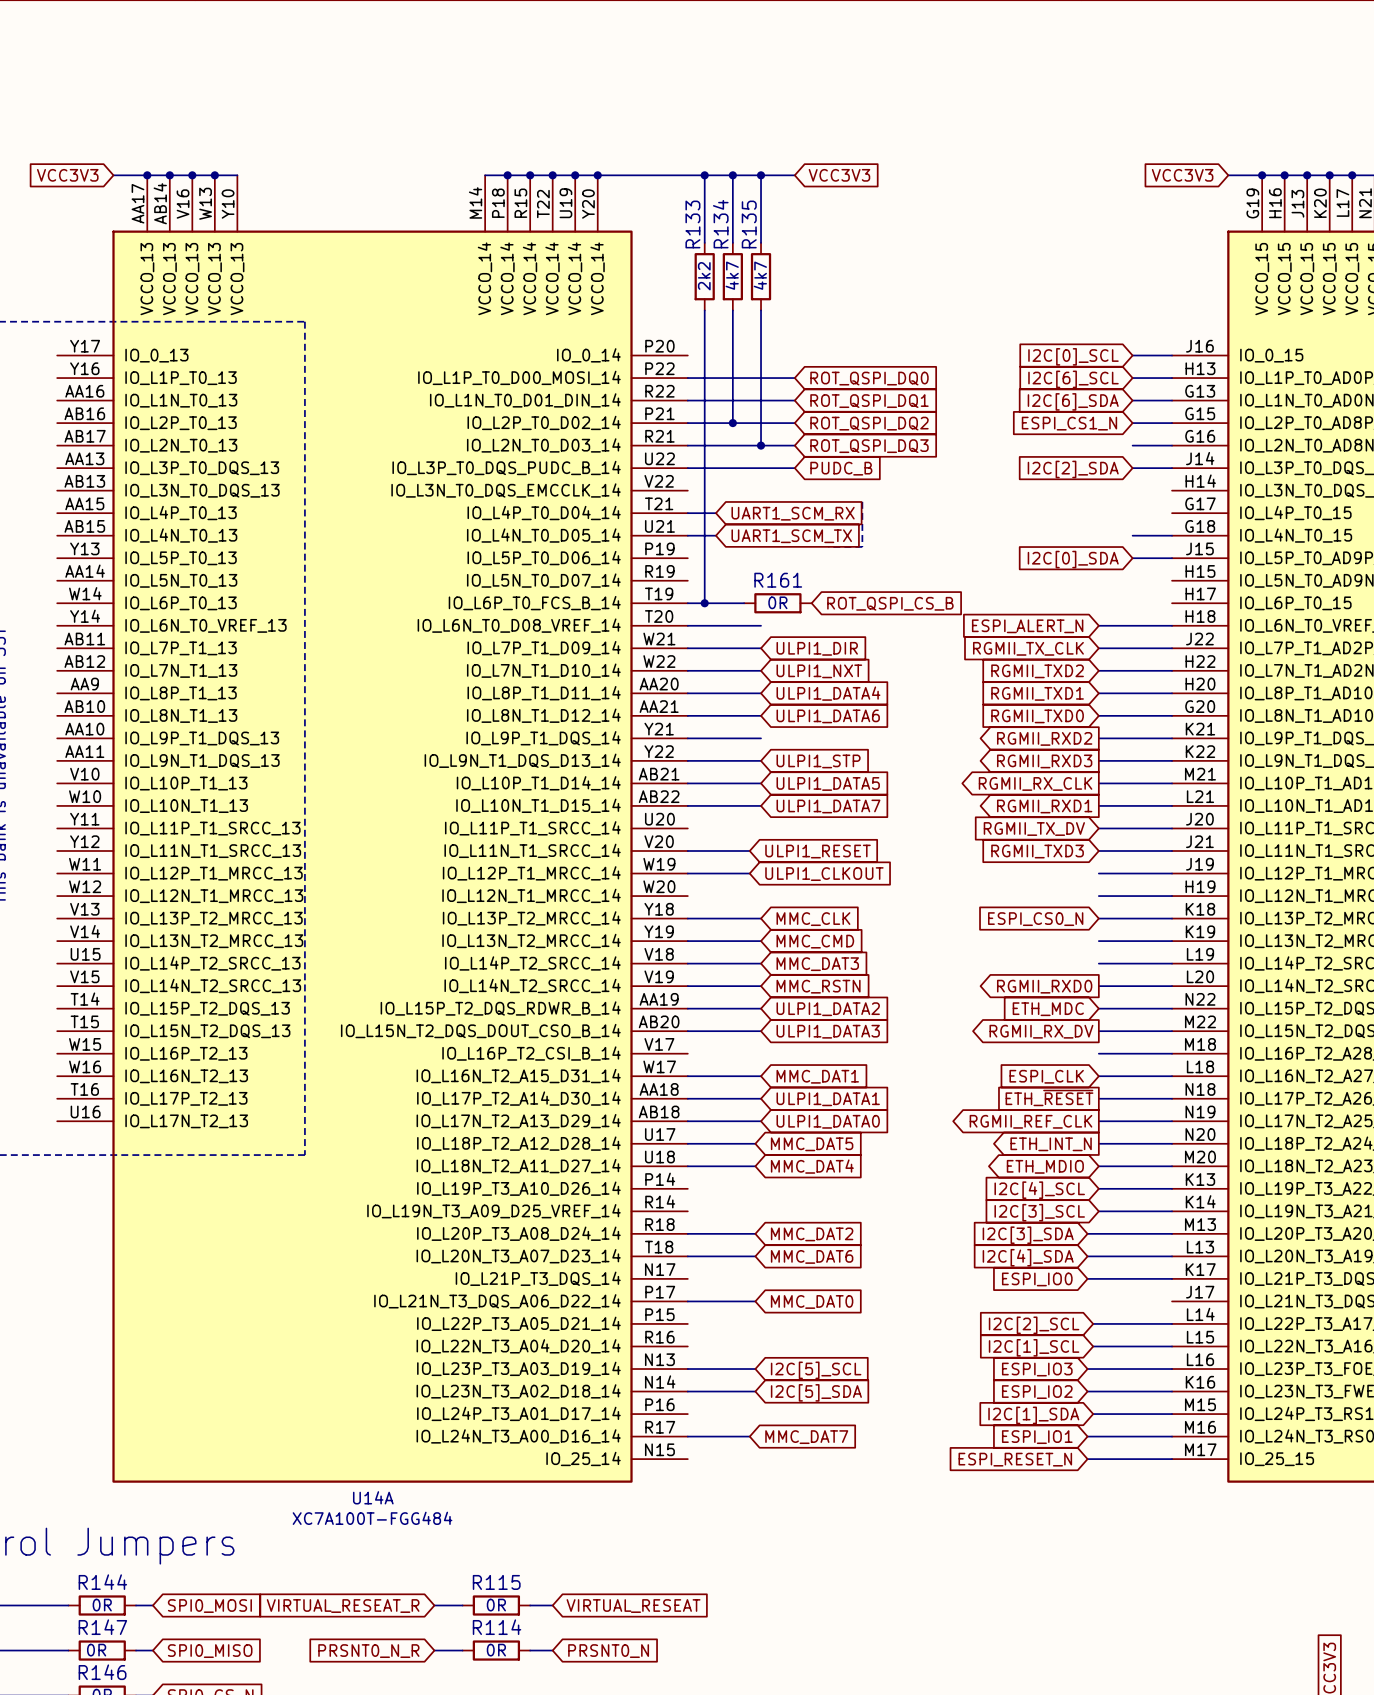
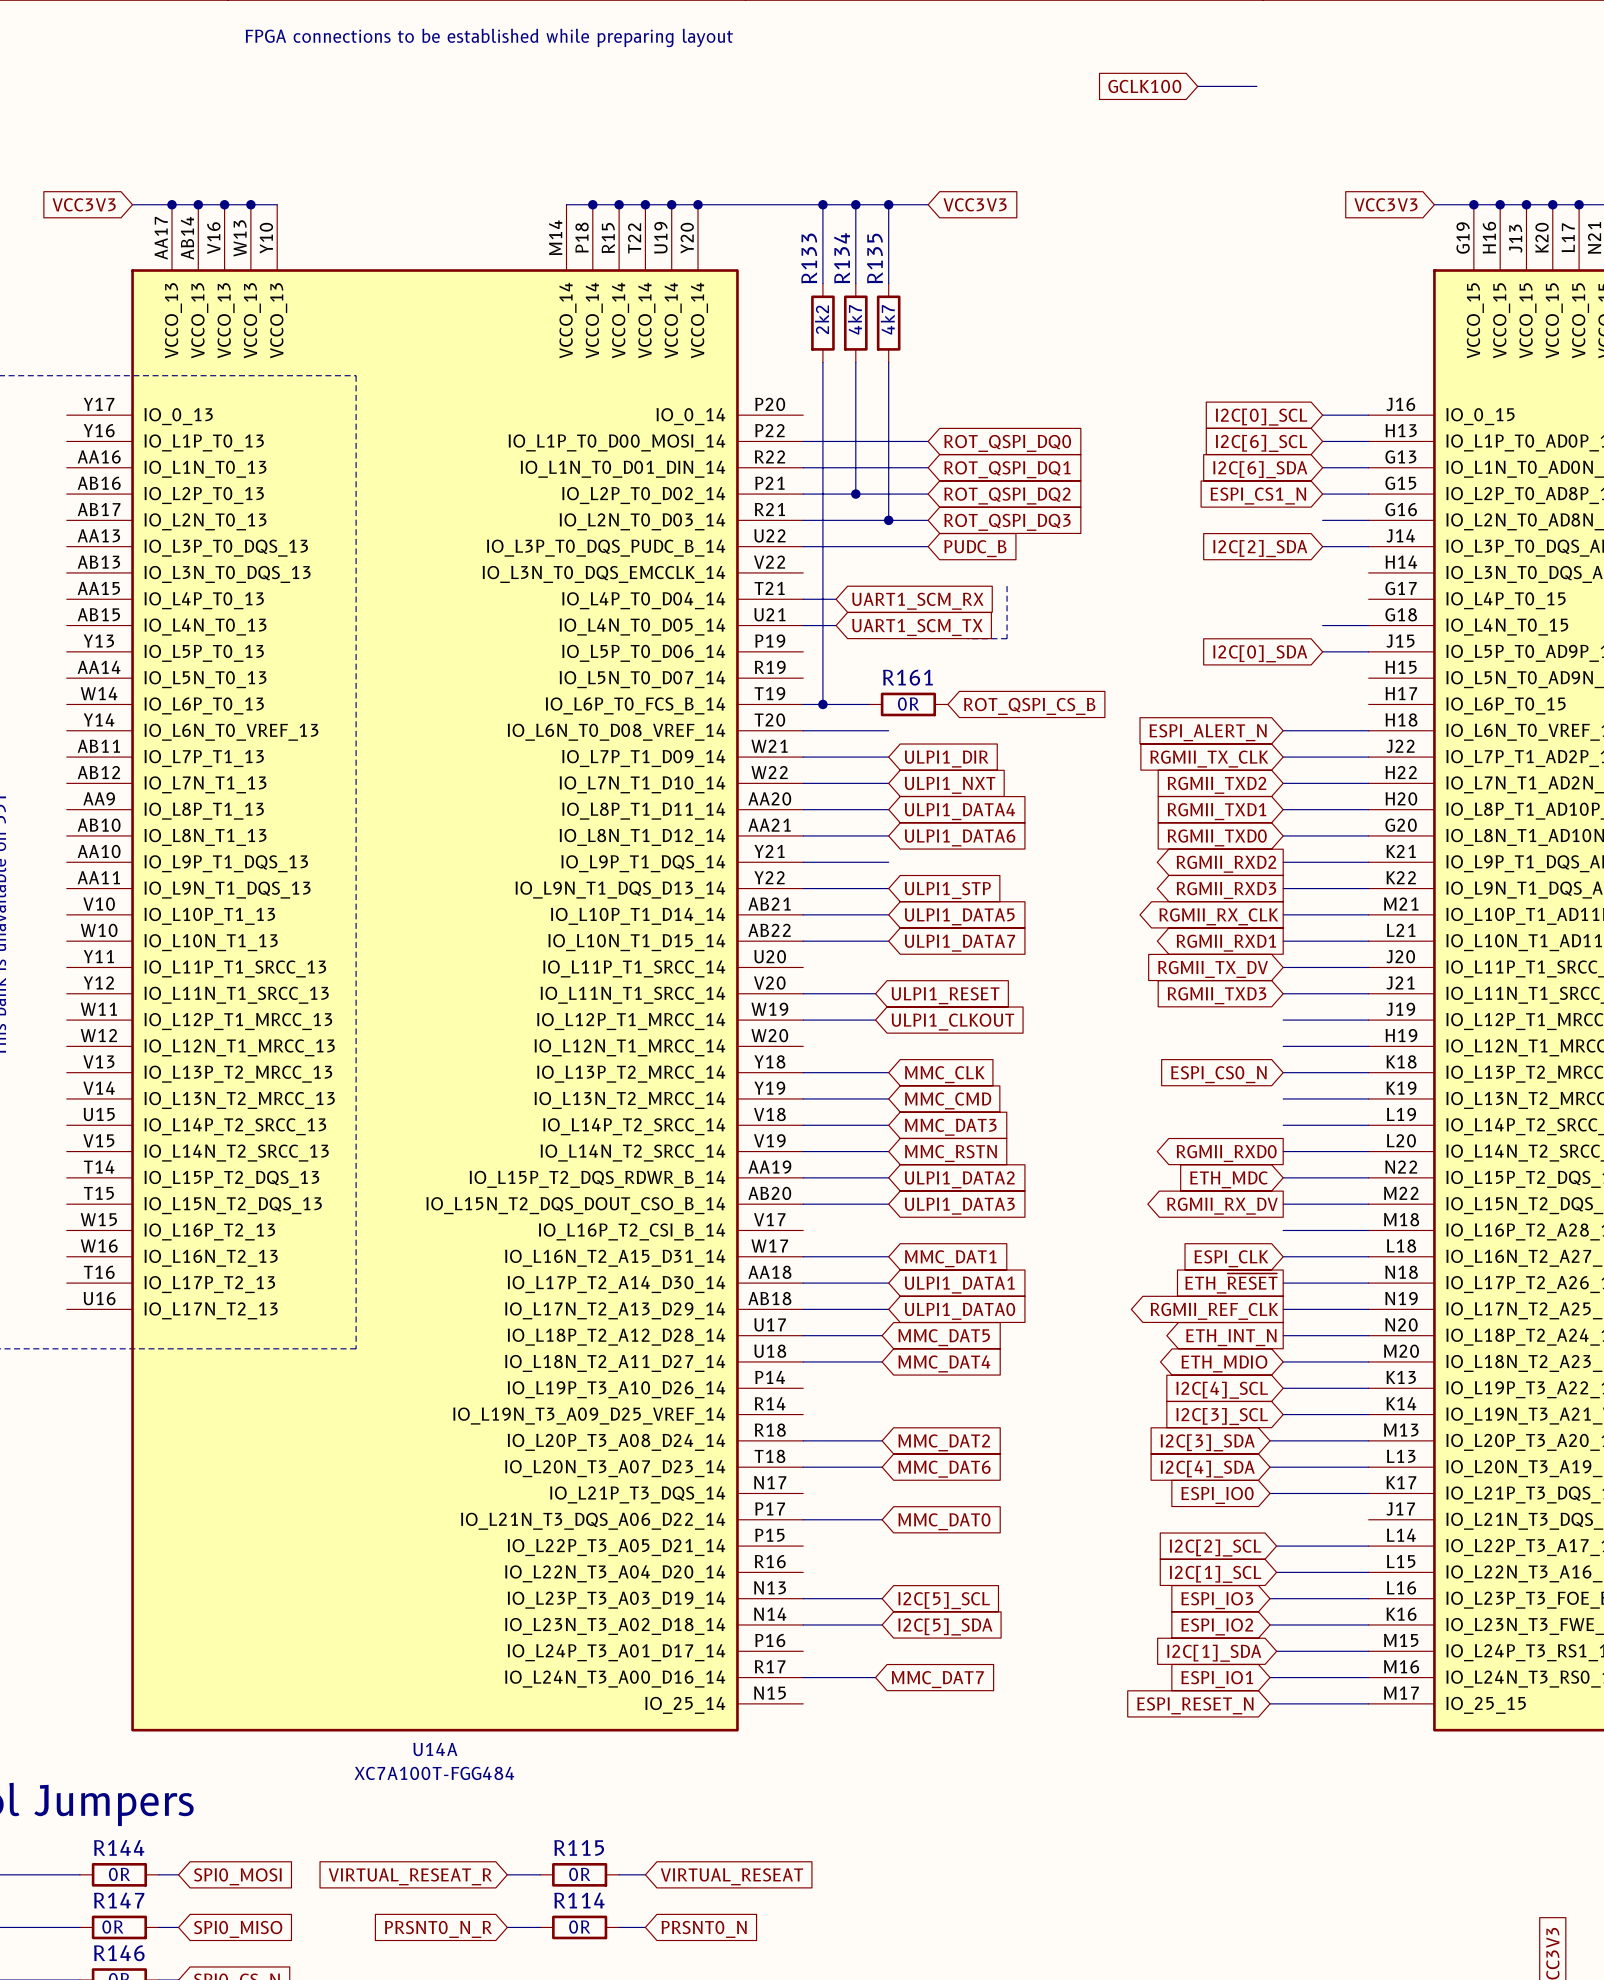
text: none -> FPGA connections to be established while preparing layout (489, 37)
global label: none -> GCLK100 (1144, 86)
wire: none -> (1197, 86) (1256, 86)

